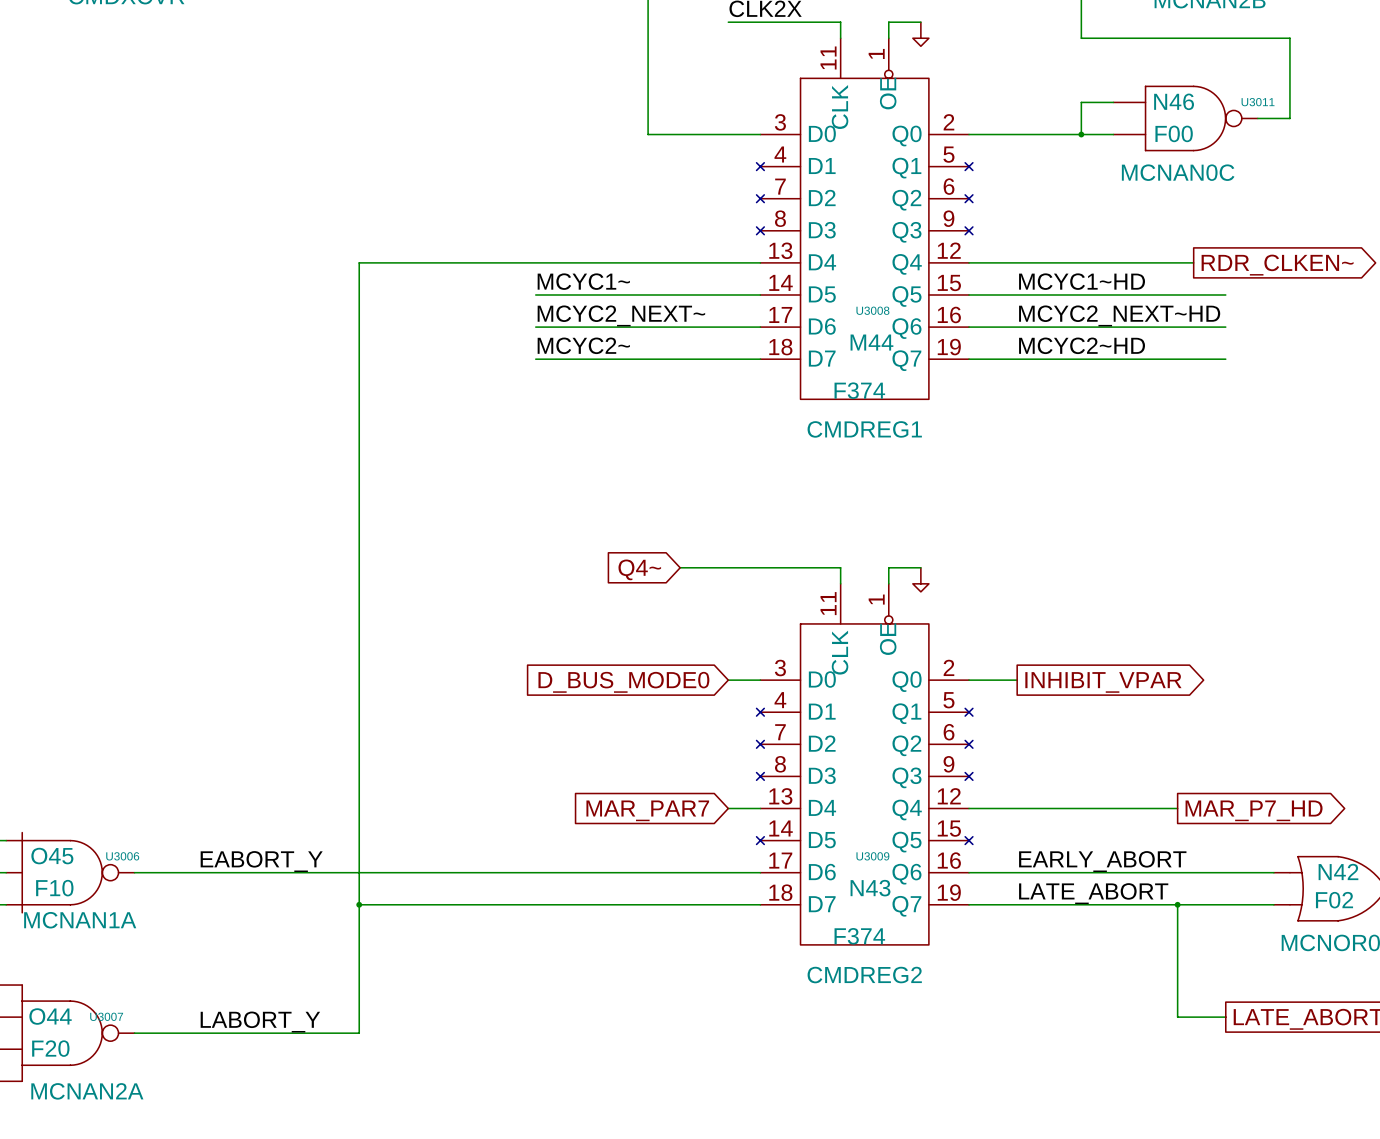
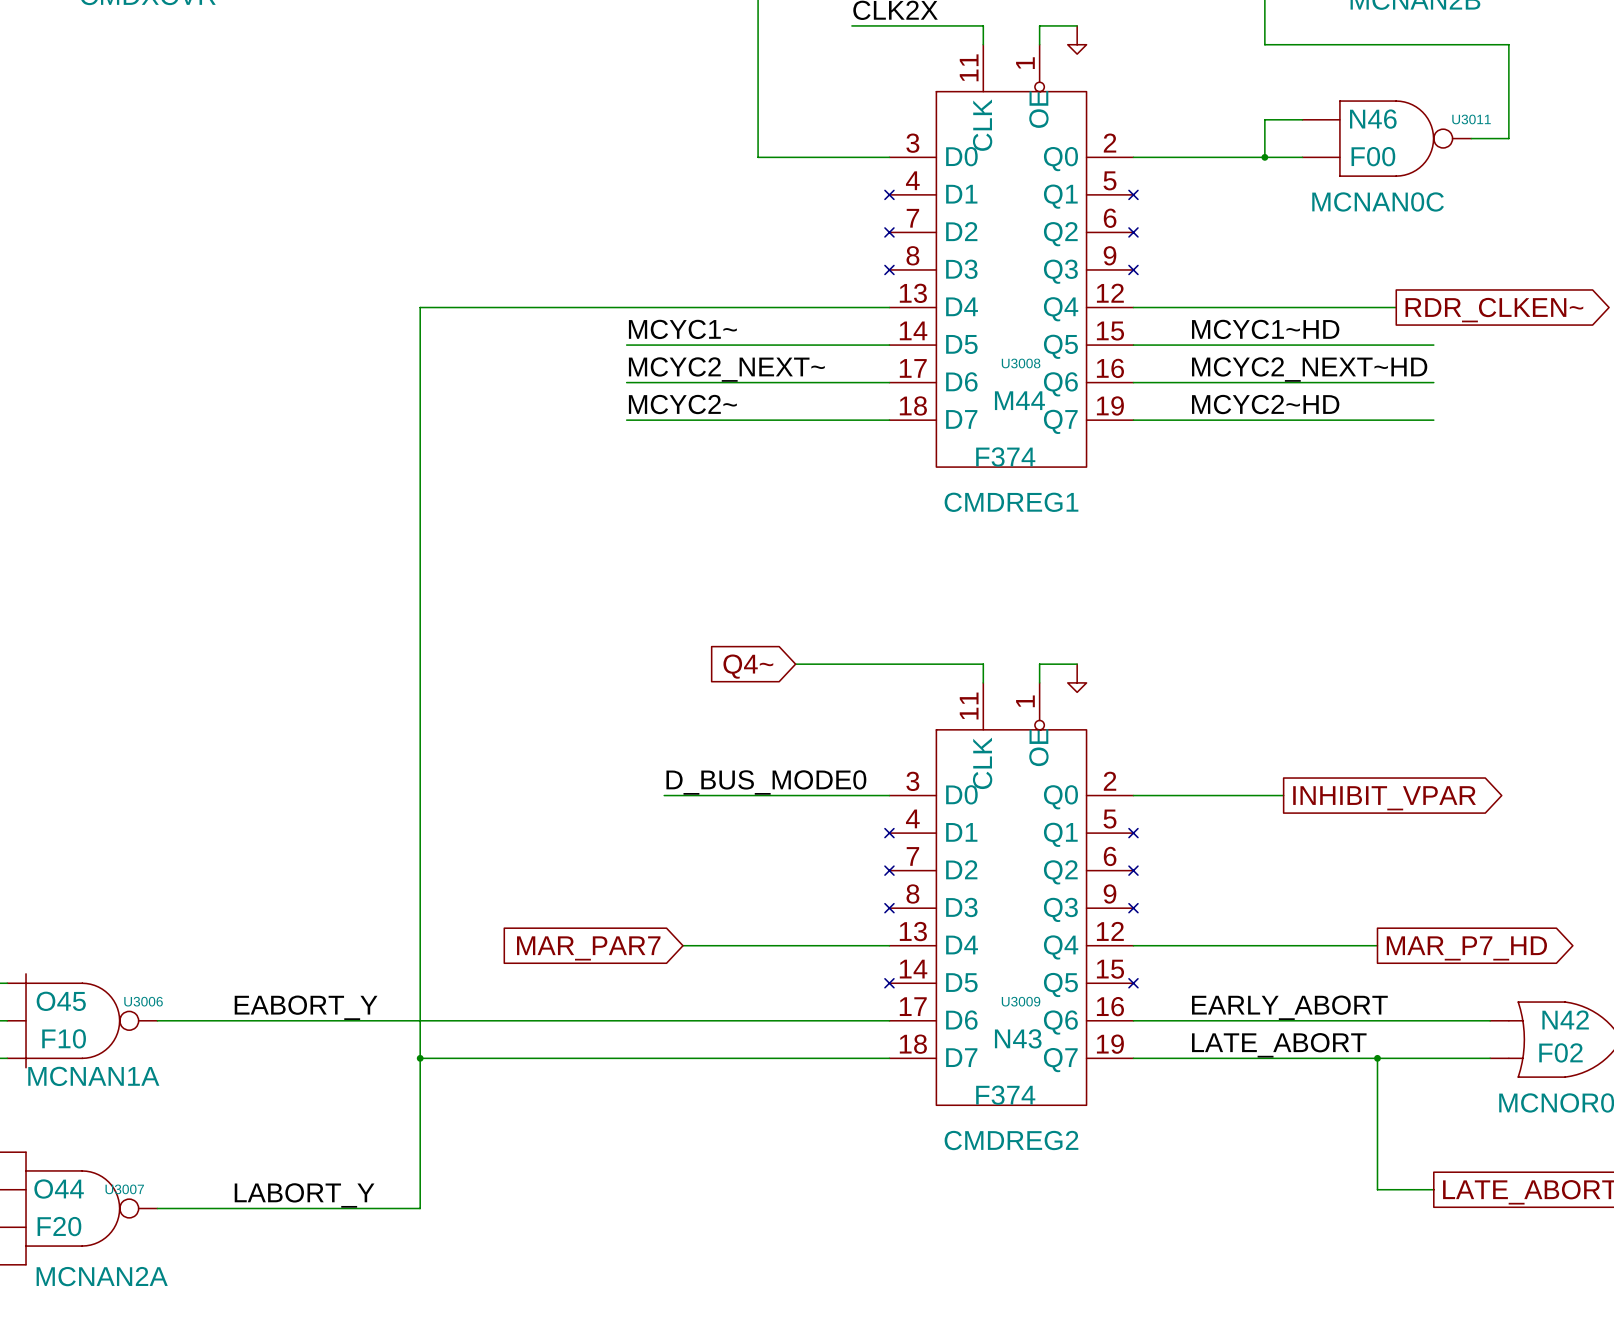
label: none -> D_BUS_MODE0 (766, 782)
wire: none -> (664, 795) (851, 795)
wire: none -> (1189, 795) (1283, 795)
global label: D_BUS_MODE0 (623, 682) -> none
global label position: INHIBIT_VPAR (1103, 682) -> INHIBIT_VPAR (1384, 798)
wire: none -> (682, 945) (851, 945)
global label position: MAR_PAR7 (647, 810) -> MAR_PAR7 (588, 948)

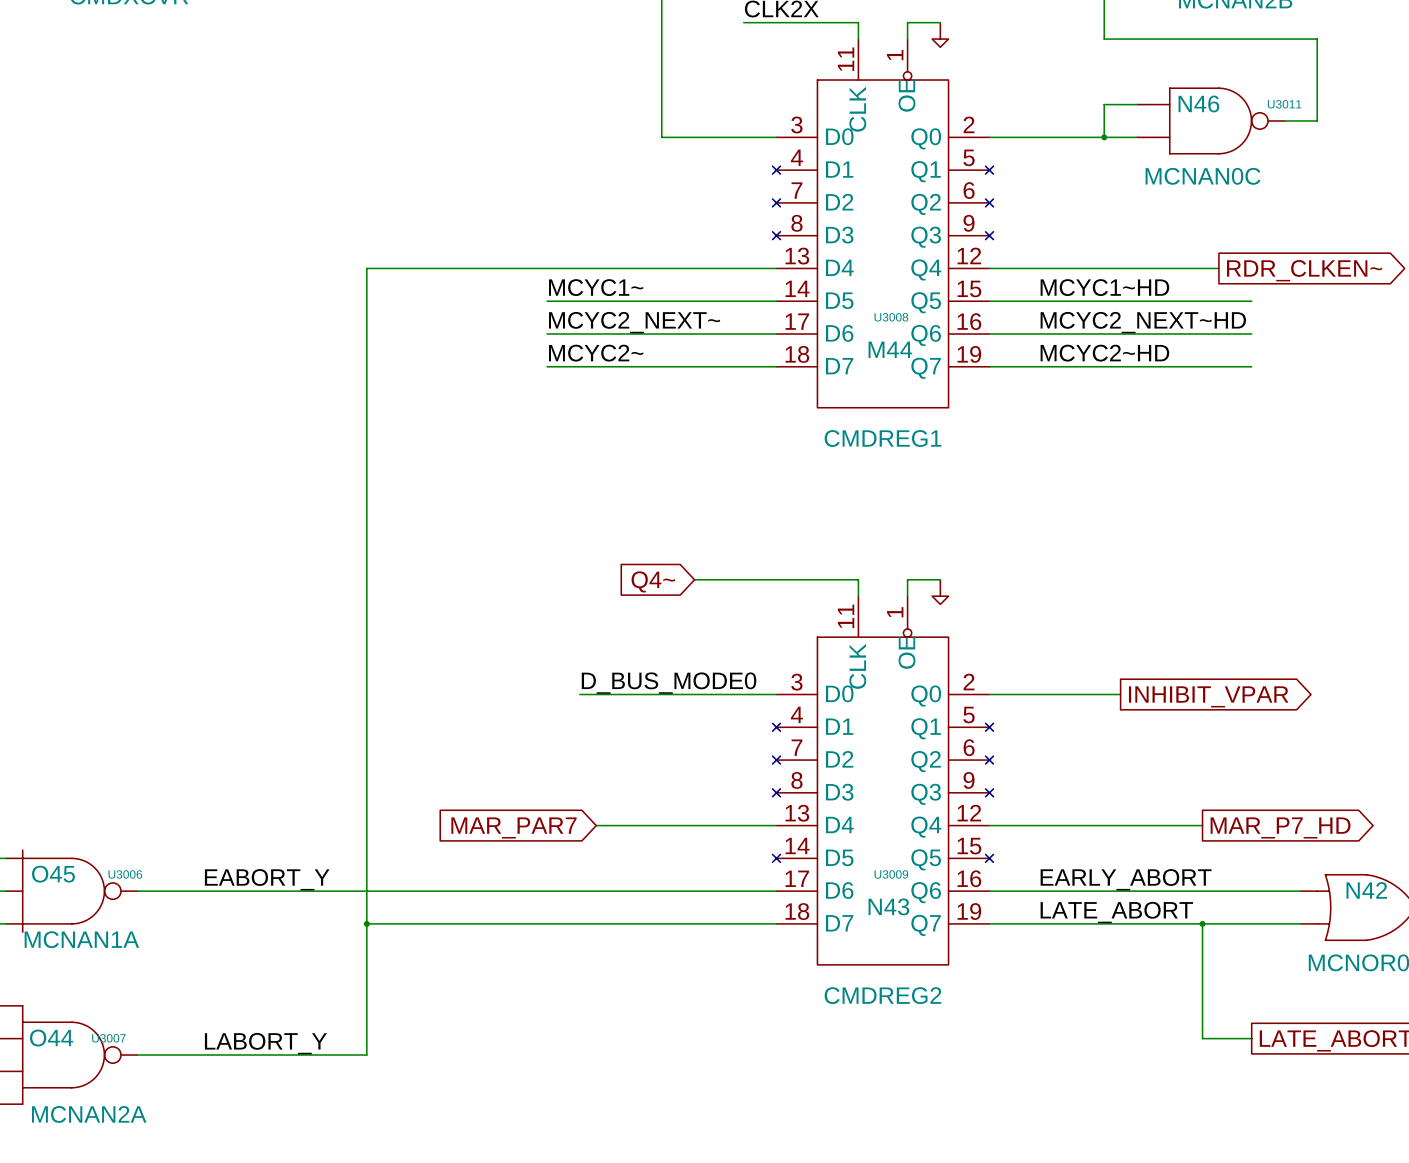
U3011 value: F00 (1373, 156) -> none
U3008 value: F374 (1005, 456) -> none
U3006 value: F10 (64, 1038) -> none
part value: F02 (1560, 1052) -> none
U3009 value: F374 (1005, 1095) -> none
U3007 value: F20 (59, 1226) -> none

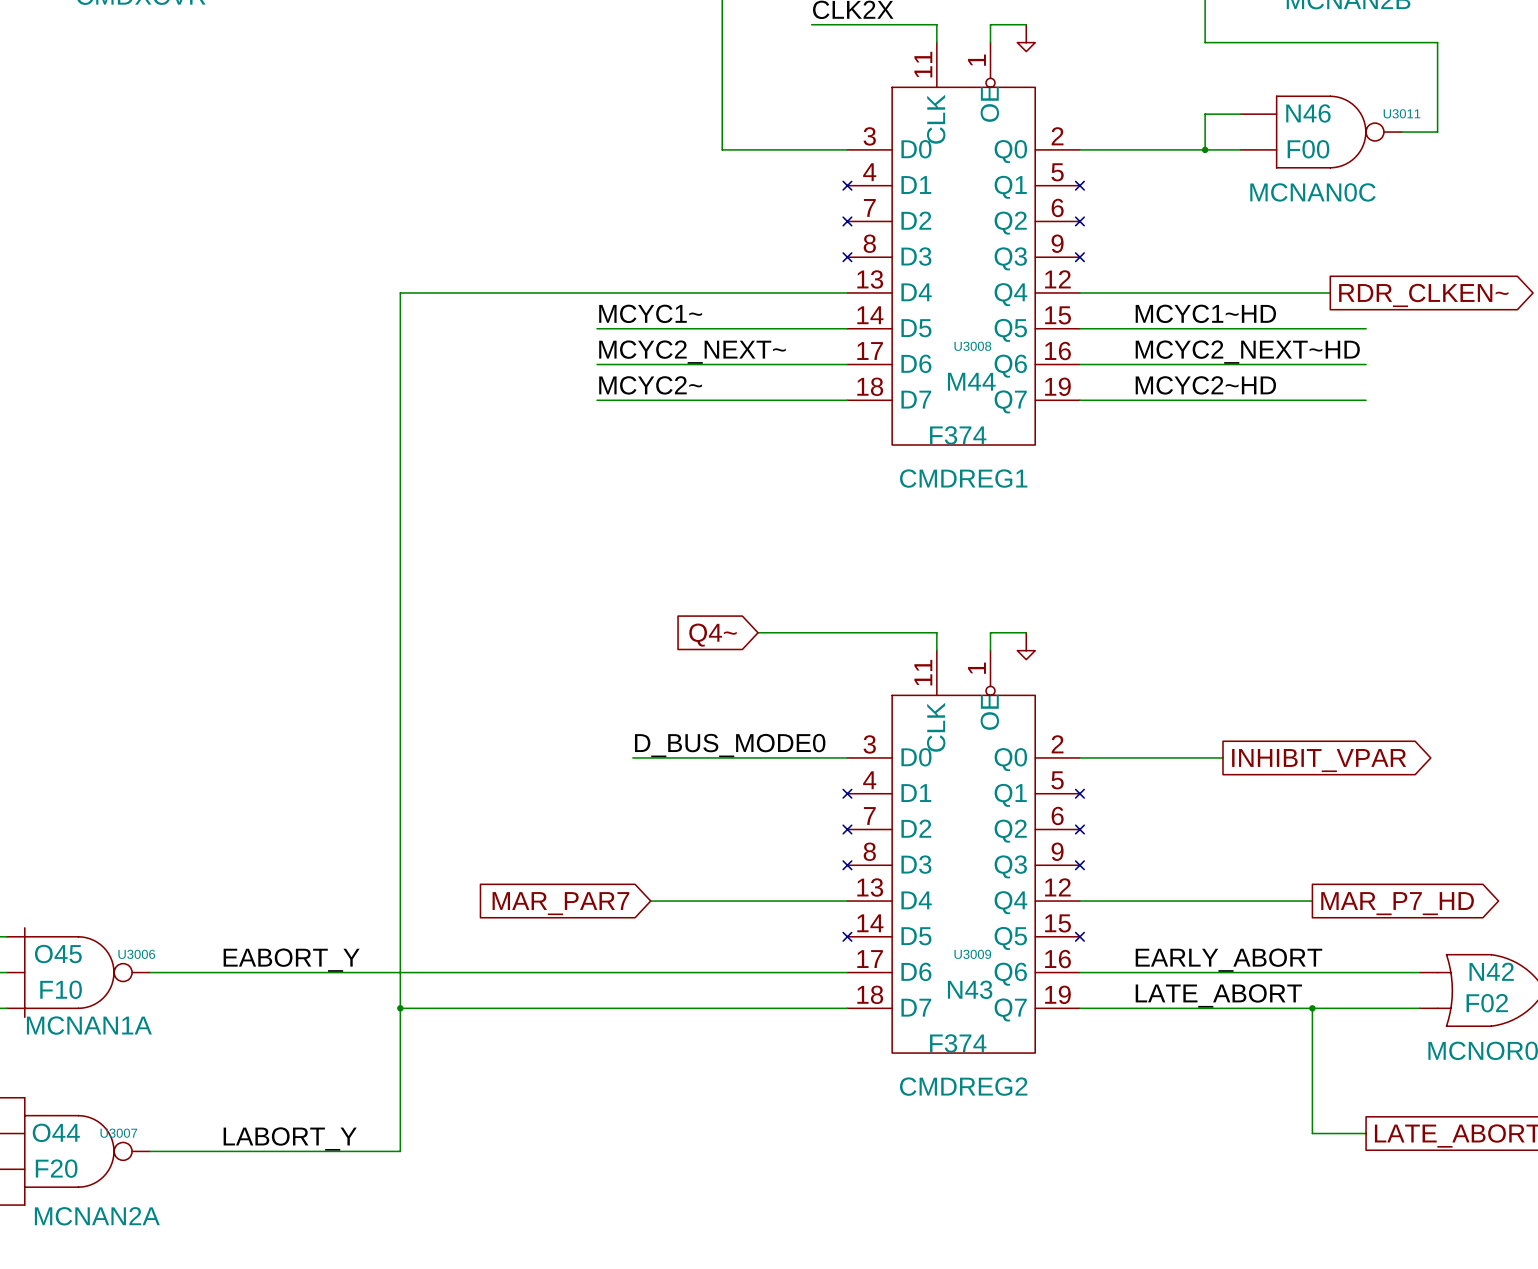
U3011 value: none -> F00 (1308, 149)
U3008 value: none -> F374 (958, 435)
U3006 value: none -> F10 (61, 989)
part value: none -> F02 (1487, 1003)
U3009 value: none -> F374 (958, 1043)
U3007 value: none -> F20 (56, 1168)

